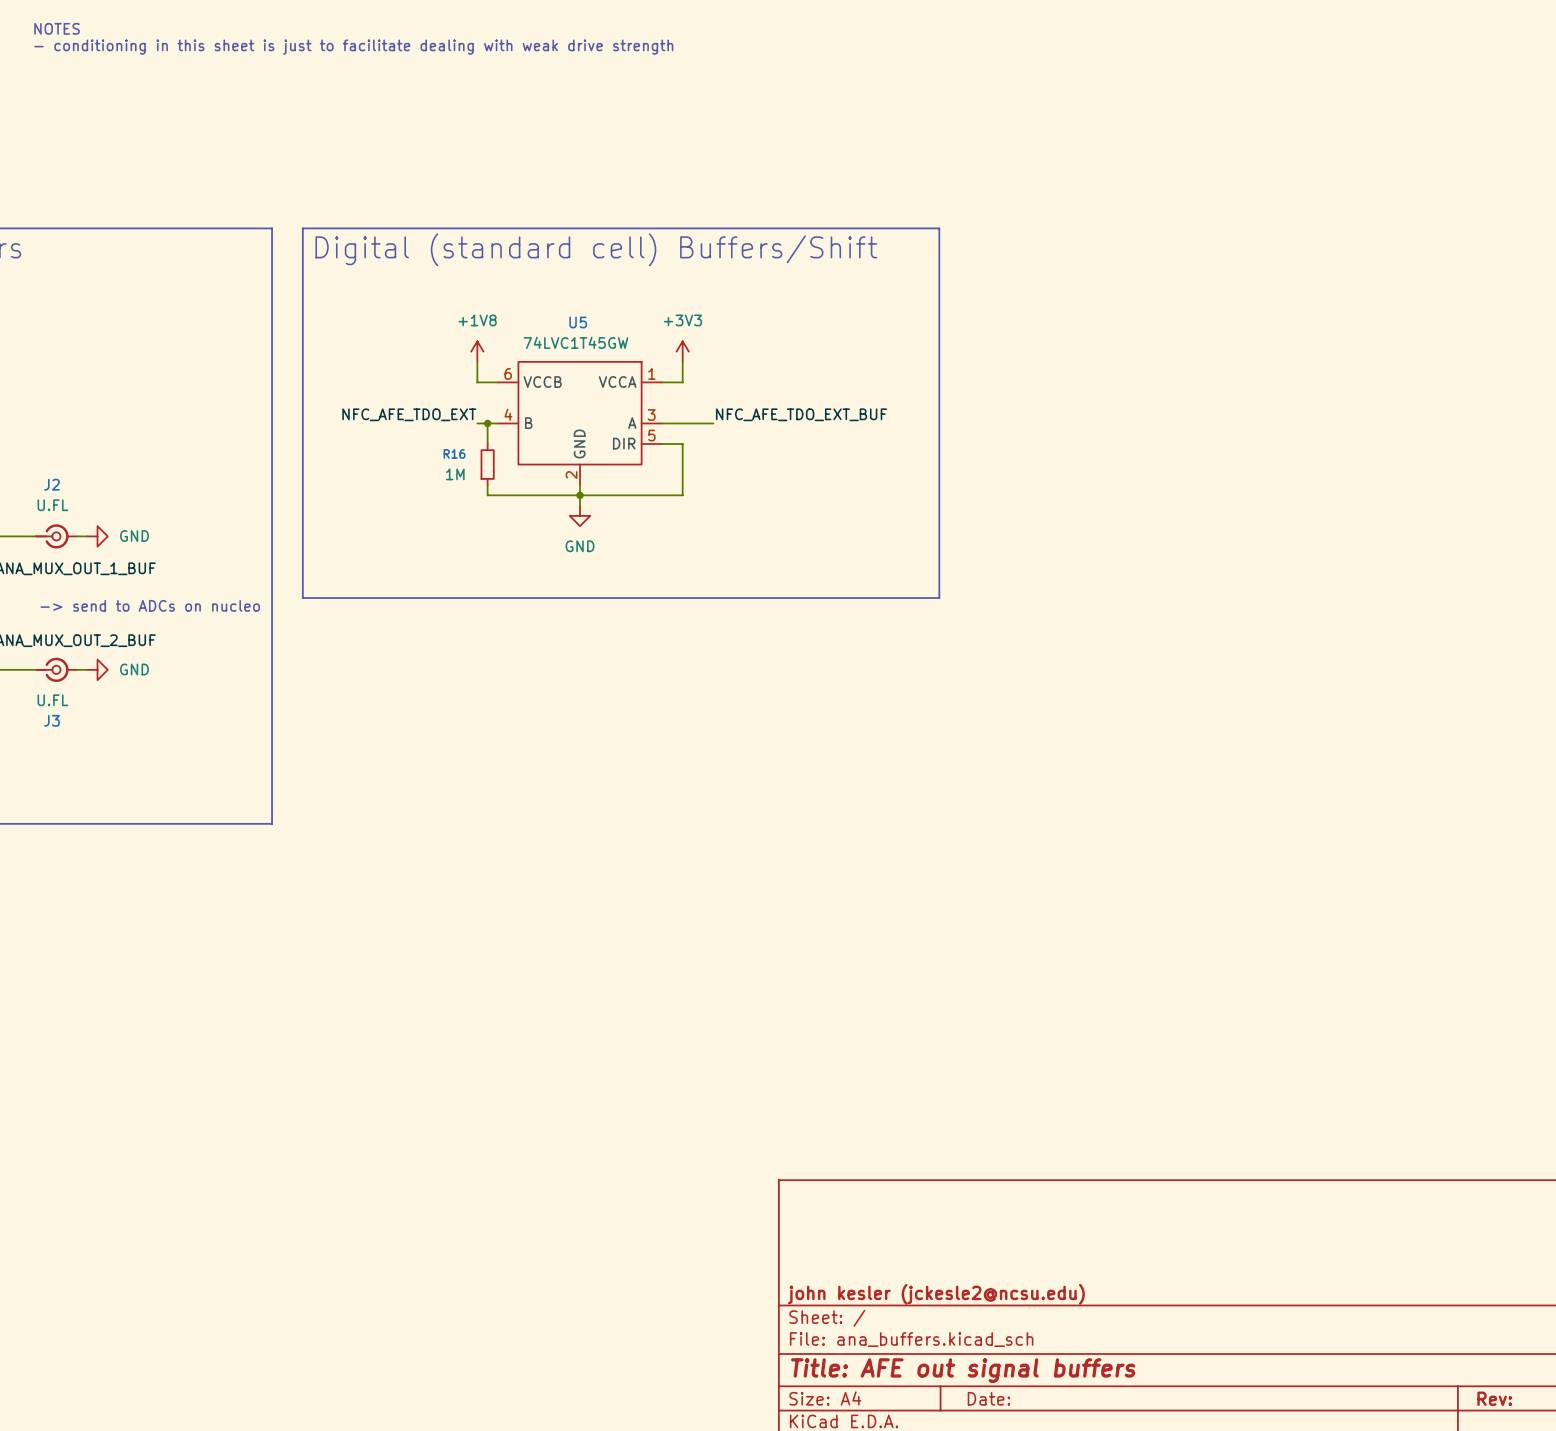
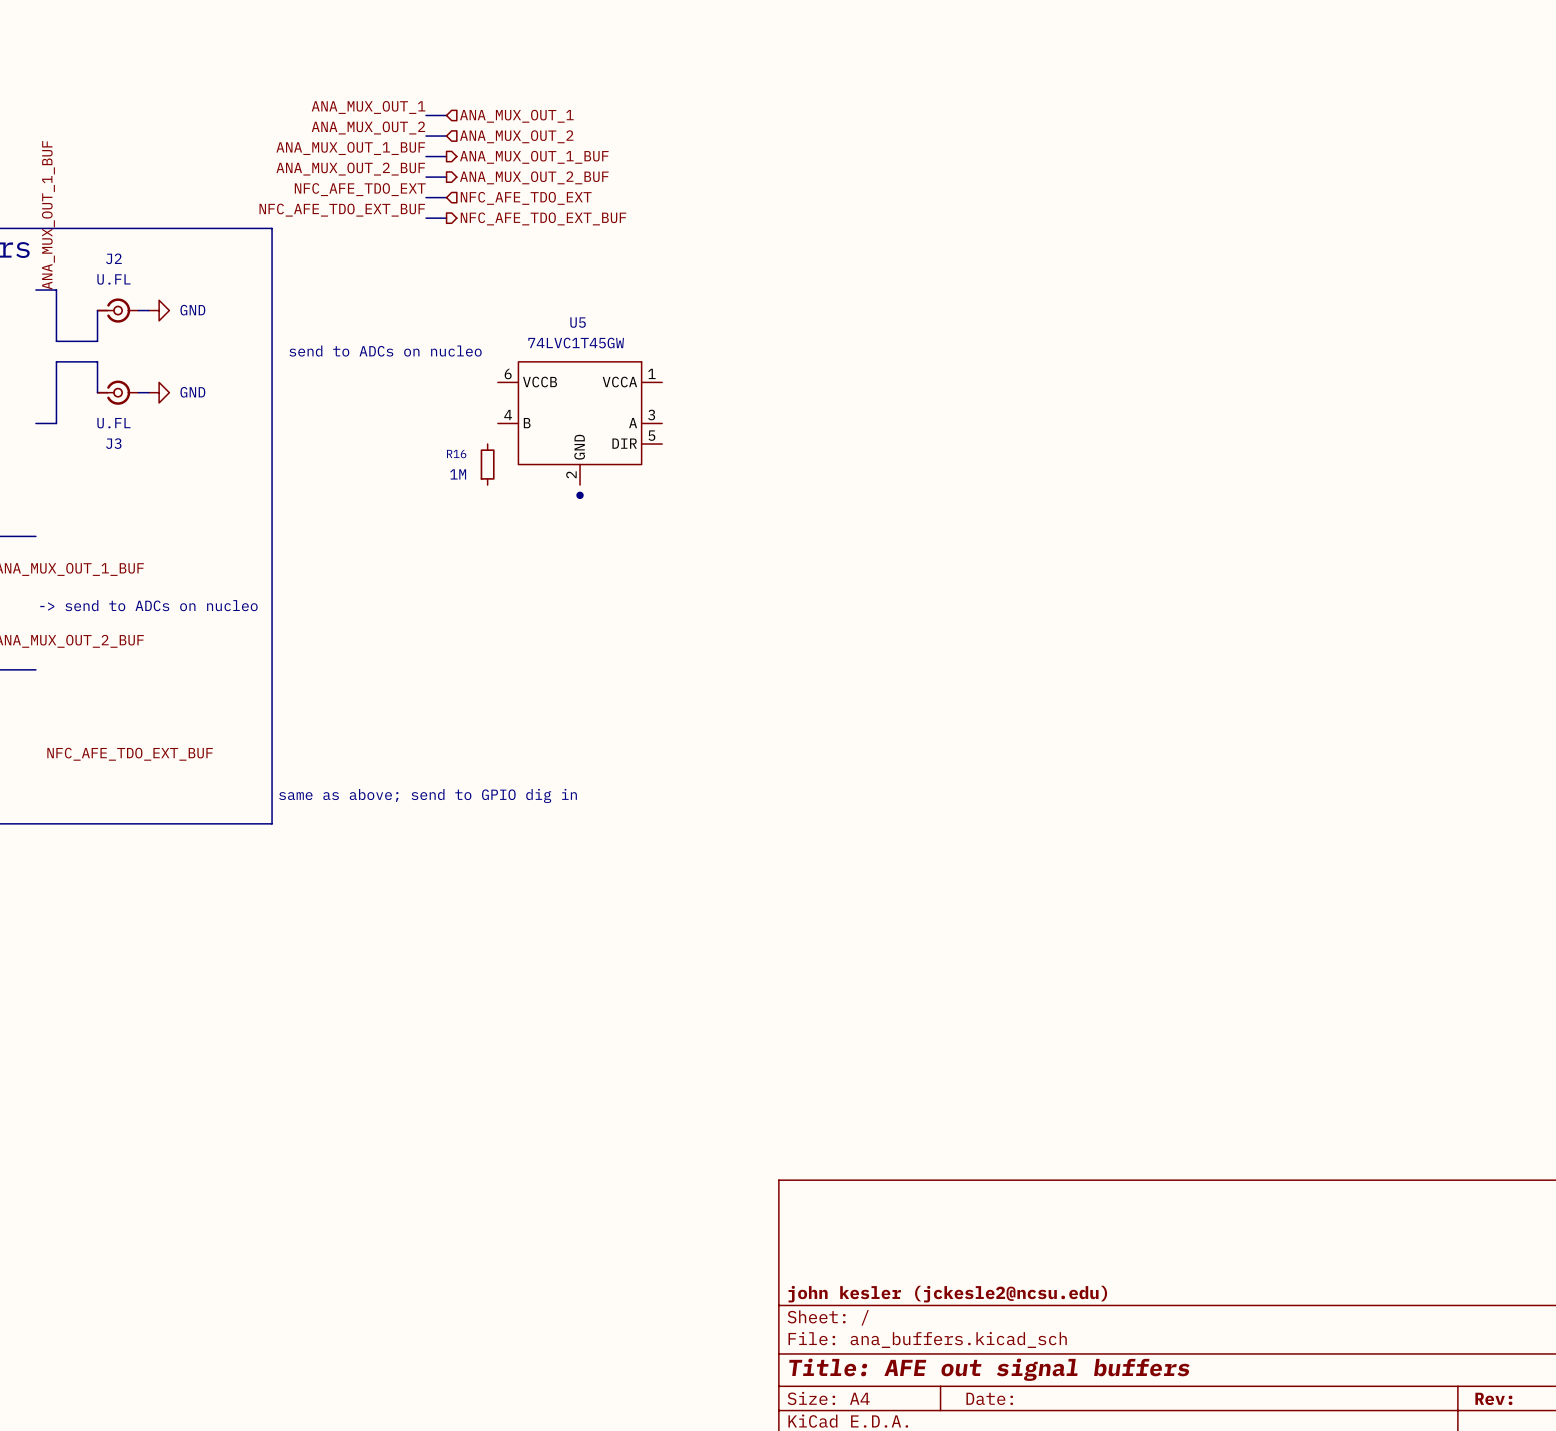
text: NOTES (57, 28) -> none
text: - conditioning in this sheet is just to facilitate dealing with weak drive strength (353, 47) -> none
label: none -> ANA_MUX_OUT_1 (368, 107)
wire: none -> (426, 115) (446, 115)
hierarchical label: none -> ANA_MUX_OUT_1 (516, 116)
label: none -> ANA_MUX_OUT_2 (368, 128)
wire: none -> (426, 136) (446, 136)
hierarchical label: none -> ANA_MUX_OUT_2 (516, 136)
label: none -> ANA_MUX_OUT_1_BUF (350, 148)
wire: none -> (426, 156) (446, 156)
hierarchical label: none -> ANA_MUX_OUT_1_BUF (534, 157)
label: none -> ANA_MUX_OUT_2_BUF (350, 169)
wire: none -> (426, 177) (446, 177)
hierarchical label: none -> ANA_MUX_OUT_2_BUF (534, 177)
label: none -> NFC_AFE_TDO_EXT (360, 189)
wire: none -> (426, 197) (446, 197)
hierarchical label: none -> NFC_AFE_TDO_EXT (526, 198)
label: none -> ANA_MUX_OUT_1_BUF (48, 215)
label: none -> NFC_AFE_TDO_EXT_BUF (342, 210)
wire: none -> (426, 218) (446, 218)
hierarchical label: none -> NFC_AFE_TDO_EXT_BUF (543, 218)
line: (302, 228) (939, 228) (939, 598) (302, 598) (302, 228) -> none
text: Digital (standard cell) Buffers/Shift (596, 249) -> none
wire: none -> (35, 290) (56, 290) (56, 341) (97, 341) (97, 310)
wire: none -> (138, 310) (148, 310)
power symbol: none -> GND (159, 310)
text: none -> send to ADCs on nucleo (385, 351)
power symbol: +1V8 (477, 351) -> none
power symbol: +3V3 (682, 351) -> none
wire: (477, 361) (477, 382) (497, 382) -> none
wire: (682, 361) (682, 382) (662, 382) -> none
wire: none -> (97, 392) (97, 361) (56, 361) (56, 423) (35, 423)
power symbol: none -> GND (159, 392)
label: NFC_AFE_TDO_EXT (409, 414) -> none
label: NFC_AFE_TDO_EXT_BUF (801, 414) -> none
wire: (477, 423) (497, 423) -> none
wire: (487, 423) (487, 444) -> none
junction: (487, 423) -> none
wire: (662, 423) (713, 423) -> none
wire: (662, 444) (682, 444) (682, 495) (487, 495) (487, 485) -> none
wire: (580, 485) (580, 505) -> none
power symbol: GND (580, 515) -> none
J2 position: (56, 536) -> (118, 310)
wire: (76, 536) (87, 536) -> (138, 392) (148, 392)
power symbol: GND (97, 536) -> none
J3 position: (56, 669) -> (118, 392)
wire: (76, 669) (87, 669) -> none
power symbol: GND (97, 669) -> none
label: none -> NFC_AFE_TDO_EXT_BUF (130, 754)
text: none -> same as above; send to GPIO dig in (428, 795)

